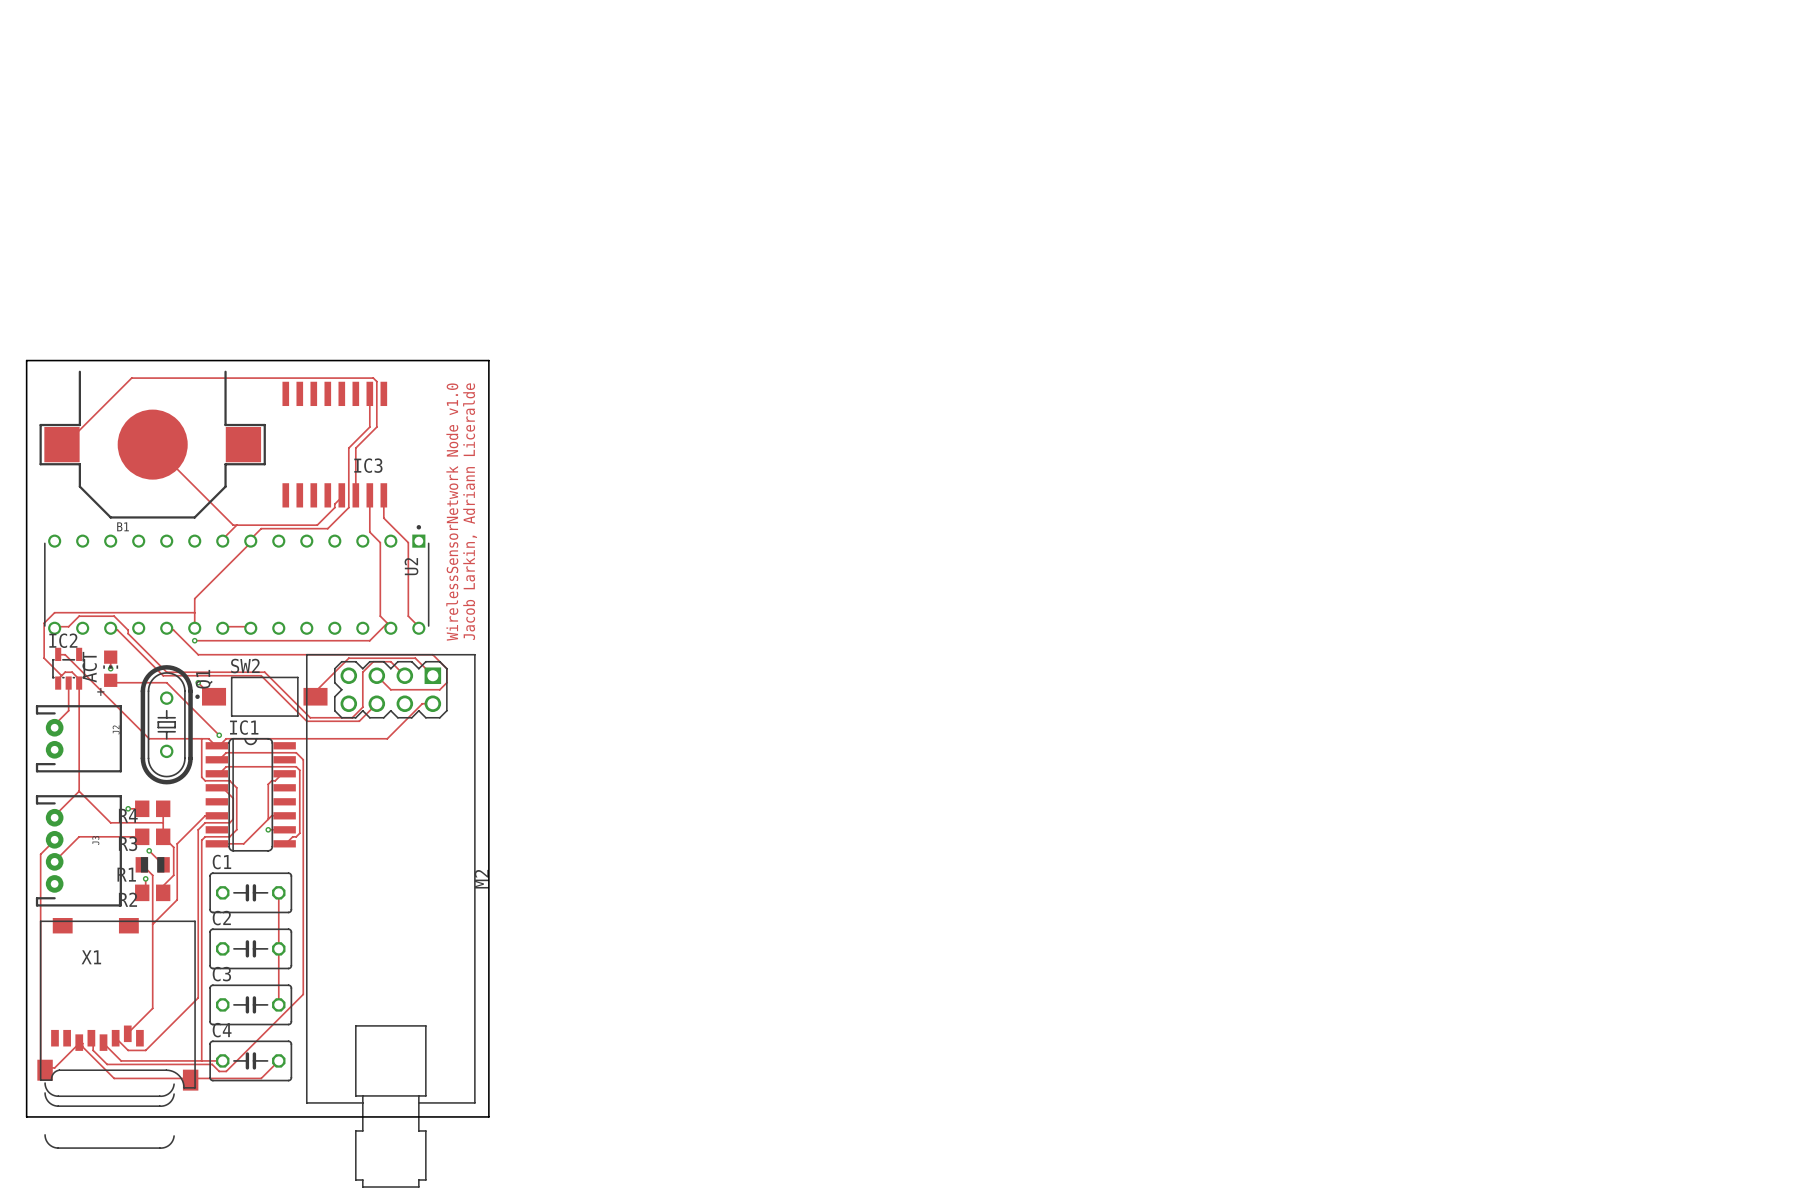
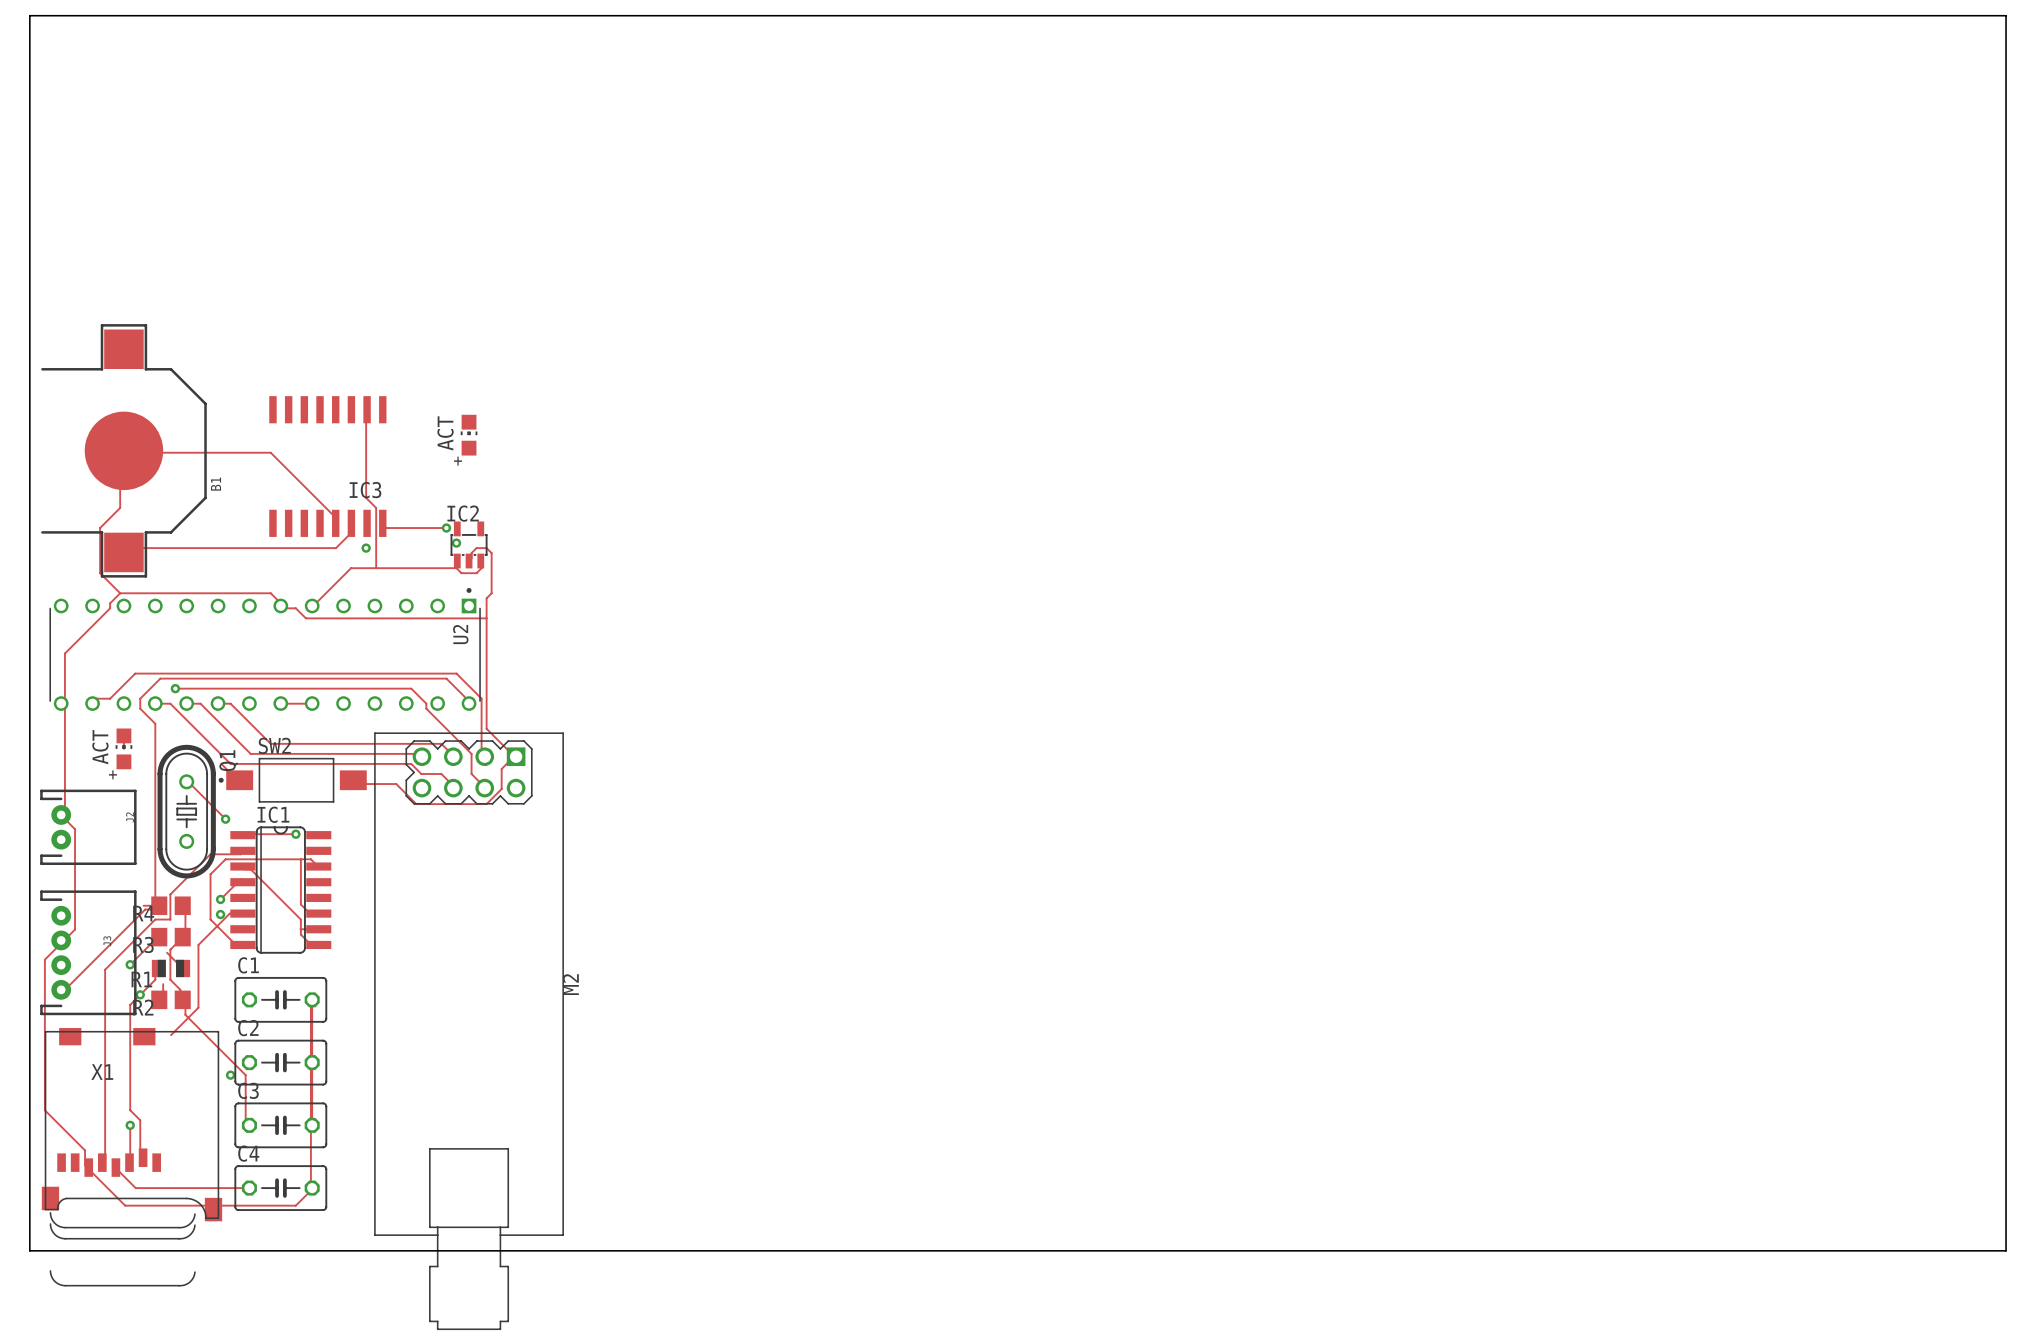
board edge: (26, 360) (488, 360) (488, 1116) -> (29, 403) (29, 15) (2006, 15) (2006, 1250) (547, 1250)
track: none -> (367, 409) (366, 497) (376, 507) (376, 568)
ACT: none -> (469, 435)
track: (369, 393) (369, 427) (348, 448) (348, 507) (327, 528) (261, 528) (250, 539) -> (120, 593) (270, 593) (280, 603)
track: (61, 444) (65, 444) (131, 378) (373, 378) (376, 381) (376, 427) (355, 448) (355, 495) -> none
track: (152, 444) (233, 525) (317, 525) (334, 507) (334, 504) (341, 495) -> none
B1 rotation: 0° (152, 444) -> 90° counterclockwise (123, 450)
IC3 position: (334, 444) -> (327, 466)
track: none -> (335, 523) (336, 517) (270, 452) (125, 452) (123, 450) (120, 452) (120, 507) (100, 528) (100, 573) (120, 593)
track: none -> (351, 523) (351, 533) (336, 548) (125, 548) (123, 552)
track: none -> (382, 523) (386, 528) (446, 528)
via: none -> (446, 528)
via: none -> (456, 543)
via: none -> (366, 548)
track: (369, 495) (369, 532) (380, 542) (380, 616) (390, 626) (390, 628) (387, 623) (369, 640) (194, 640) -> none
track: (383, 495) (383, 518) (408, 542) (408, 616) (418, 628) -> (61, 989) (64, 989) (145, 909) (155, 909) (159, 905) (155, 904) (155, 723) (140, 708) (140, 698) (160, 678) (446, 678) (469, 703)
track: none -> (480, 561) (481, 568) (476, 573) (461, 573) (456, 568)
track: none -> (456, 568) (351, 568) (312, 605)
text: Jacob Larkin, Adriann Liceralde (470, 511) -> none
text: WirelessSensorNetwork Node v1.0 (452, 512) -> none
track: (236, 525) (222, 541) -> none
track: none -> (120, 593) (110, 603) (110, 608) (64, 653) (64, 814) (61, 814) (75, 829) (75, 929) (64, 939) (61, 940) (59, 944) (44, 959) (44, 1110) (85, 1150) (85, 1165) (125, 1205) (210, 1205) (213, 1209) (215, 1205) (295, 1205) (312, 1188) (312, 999)
track: (250, 542) (194, 598) (194, 628) -> (280, 607) (295, 608) (305, 618) (486, 618)
track: (194, 612) (54, 612) (44, 623) (44, 658) (61, 675) -> none
via: none -> (175, 688)
track: (54, 628) (54, 626) (68, 626) (79, 616) (114, 616) (128, 630) (128, 633) (166, 672) (264, 672) (310, 717) (352, 717) (362, 707) (362, 672) (373, 661) (390, 661) (404, 675) -> (218, 703) (230, 703) (270, 743) (441, 743) (453, 756)
track: none -> (92, 703) (95, 698) (110, 698) (135, 673) (456, 673) (481, 698) (481, 753) (484, 756)
track: (110, 628) (110, 630) (117, 630) (163, 675) (261, 675) (306, 721) (359, 721) (376, 703) -> none
track: none -> (155, 703) (170, 703) (230, 763) (411, 763) (421, 773) (441, 773) (453, 788)
track: (166, 628) (166, 630) (173, 630) (198, 654) (432, 654) (446, 668) (446, 682) (439, 689) (390, 689) (376, 675) -> (186, 703) (200, 703) (250, 753) (421, 753) (421, 756)
track: (222, 628) (222, 626) (250, 626) (250, 628) -> (312, 703) (280, 703)
via: (194, 640) -> none
track: (58, 654) (65, 654) (149, 738) (208, 738) (215, 745) (219, 745) (226, 738) (387, 738) (422, 703) (432, 703) -> (175, 688) (411, 688) (426, 703) (426, 708) (471, 753) (471, 773) (484, 788)
IC2 position: (68, 668) -> (469, 544)
via: (110, 668) -> none
track: (432, 675) (415, 658) (348, 658) (317, 689) (317, 696) (315, 696) -> (469, 561) (471, 558) (471, 553) (476, 548) (486, 548) (491, 553) (491, 593) (486, 598) (486, 728) (516, 756) (501, 768) (501, 789) (486, 804) (416, 804) (396, 784) (356, 784) (353, 780)
track: (110, 680) (110, 682) (166, 682) (219, 735) -> none
via: (198, 682) -> none
track: (58, 683) (58, 679) (65, 672) (72, 672) (79, 679) (79, 791) -> none
track: (68, 683) (68, 710) (54, 724) (54, 727) -> none
track: none -> (186, 781) (225, 819)
via: none -> (225, 819)
via: (219, 735) -> none
track: (201, 738) (201, 777) (205, 780) (229, 780) (236, 787) (236, 829) (229, 836) (205, 836) (201, 840) (201, 1060) -> none
track: none -> (295, 834) (242, 835)
via: none -> (295, 834)
track: (216, 759) (226, 752) (296, 752) (303, 759) (303, 994) (226, 1071) (219, 1071) (212, 1064) (107, 1064) (93, 1050) (93, 1039) (91, 1038) -> (242, 850) (240, 854) (210, 854) (170, 894) (170, 919) (155, 919) (105, 969) (105, 1160) (102, 1162)
track: none -> (300, 859) (300, 904) (310, 914) (318, 913)
track: (216, 773) (226, 766) (296, 766) (299, 770) (299, 833) (284, 843) -> (242, 866) (245, 869) (250, 869) (300, 919) (300, 934) (310, 944) (318, 944)
track: (284, 773) (268, 784) (268, 819) -> none
track: (216, 787) (222, 787) (233, 798) (233, 819) (229, 822) (205, 822) (198, 829) (198, 997) (145, 1050) (128, 1050) (115, 1038) -> (130, 1125) (129, 1162)
track: none -> (242, 882) (240, 879) (220, 899)
track: (79, 791) (54, 817) -> none
track: (79, 791) (110, 822) (163, 822) -> none
via: none -> (220, 899)
via: (128, 808) -> none
track: (163, 808) (163, 836) (173, 847) (173, 875) (163, 885) (163, 892) -> (182, 905) (185, 909) (185, 934) (170, 949) (170, 979) (180, 989) (180, 999) (185, 999) (185, 1014) (245, 1075) (245, 1125) (249, 1125)
track: (284, 815) (271, 815) (243, 843) (216, 843) -> (318, 866) (310, 859) (225, 859) (210, 874) (210, 919) (235, 944) (242, 944)
via: none -> (220, 914)
via: (268, 829) -> none
track: (142, 836) (79, 836) (54, 861) -> (159, 937) (130, 964)
track: (54, 839) (40, 854) (40, 1064) (45, 1070) (47, 1067) (54, 1067) (79, 1042) (82, 1043) (82, 1046) (114, 1078) (187, 1078) (190, 1080) (191, 1078) (261, 1078) (278, 1060) -> none
via: (149, 850) -> none
via: none -> (130, 964)
track: (141, 864) (152, 875) (152, 1008) (127, 1033) -> (158, 968) (155, 969) (155, 979) (130, 1004) (130, 1110) (140, 1120) (140, 1155) (143, 1157)
via: (145, 878) -> none
via: none -> (140, 994)
M2 position: (390, 920) -> (469, 1031)
via: none -> (230, 1075)
via: none -> (130, 1125)

